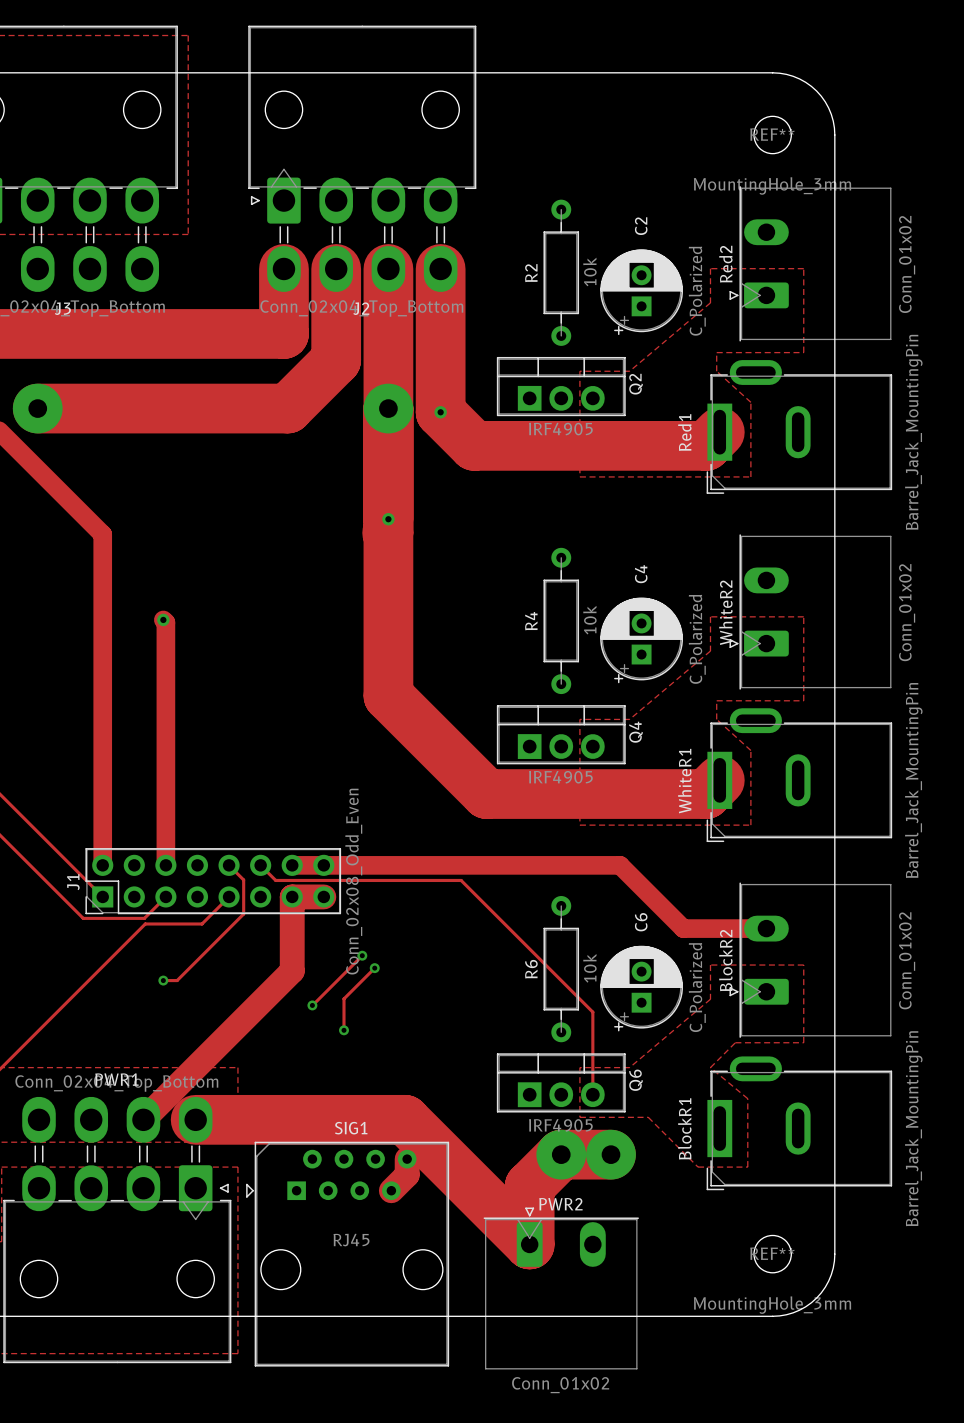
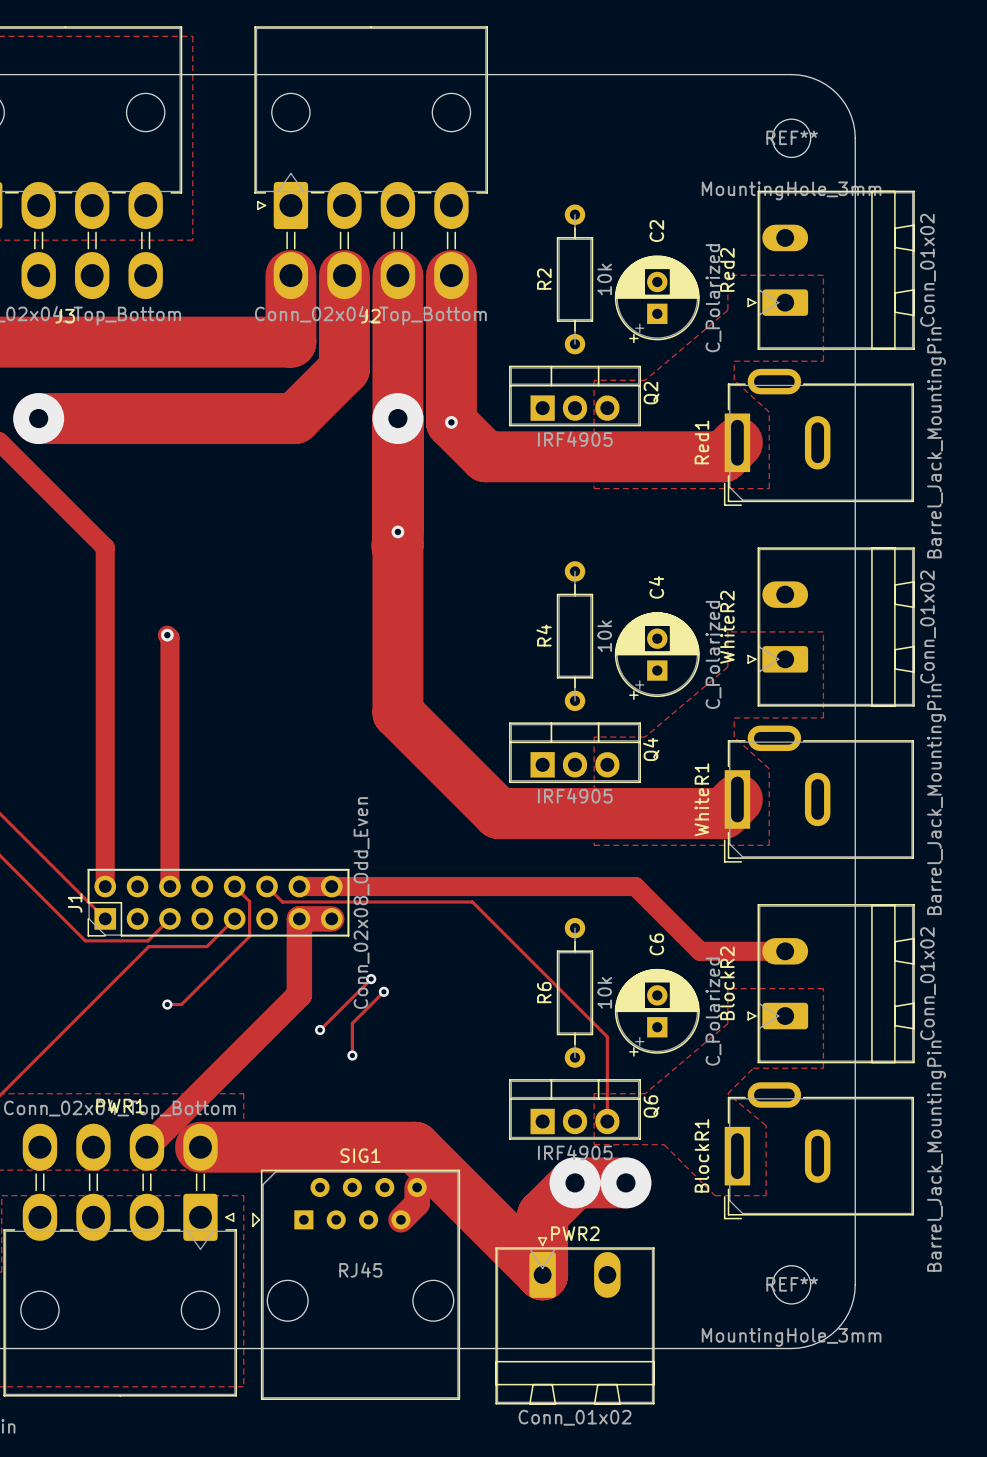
Red2 footprint: [729, 186, 892, 342] -> [747, 190, 915, 350]
WhiteR2 footprint: [729, 534, 892, 690] -> [747, 547, 915, 707]
BlockR2 footprint: [729, 882, 892, 1038] -> [747, 904, 915, 1064]
PWR2 footprint: [483, 1207, 639, 1370] -> [495, 1237, 655, 1405]

